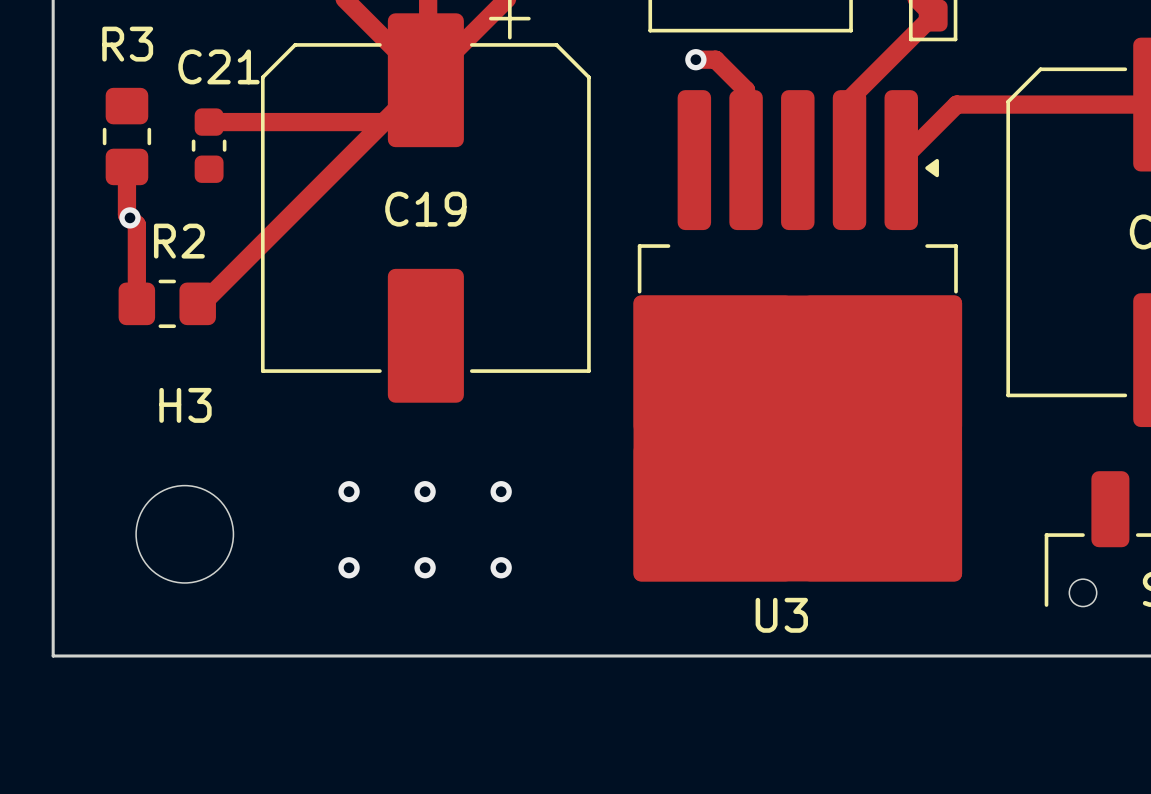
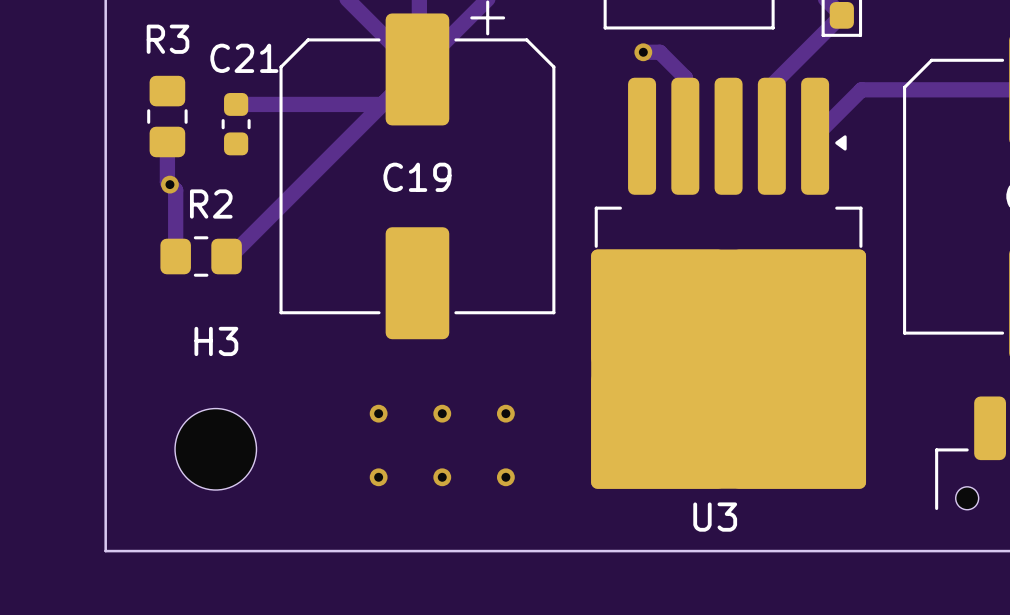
via: (349, 491) -> none
via: none -> (378, 413)
via: (425, 491) -> none
via: none -> (442, 413)
via: (501, 491) -> none
via: none -> (505, 413)
via: (349, 567) -> none
via: none -> (378, 477)
via: (425, 567) -> none
via: none -> (442, 477)
via: (501, 567) -> none
via: none -> (505, 477)

